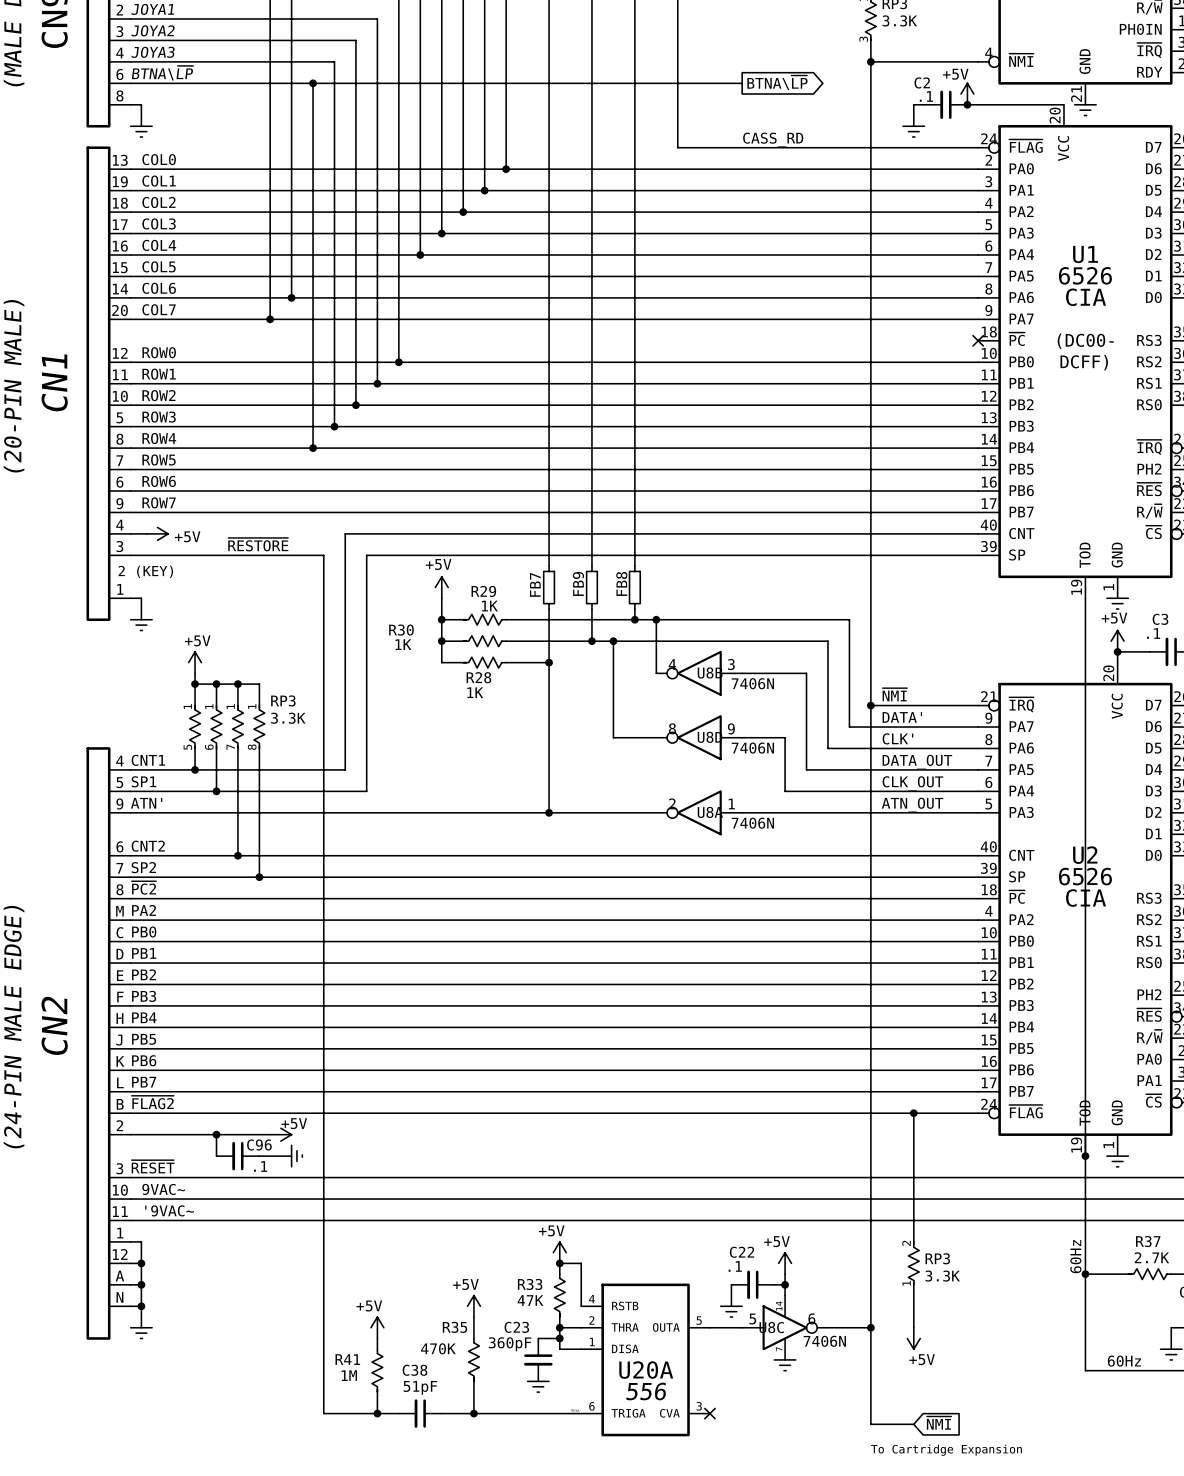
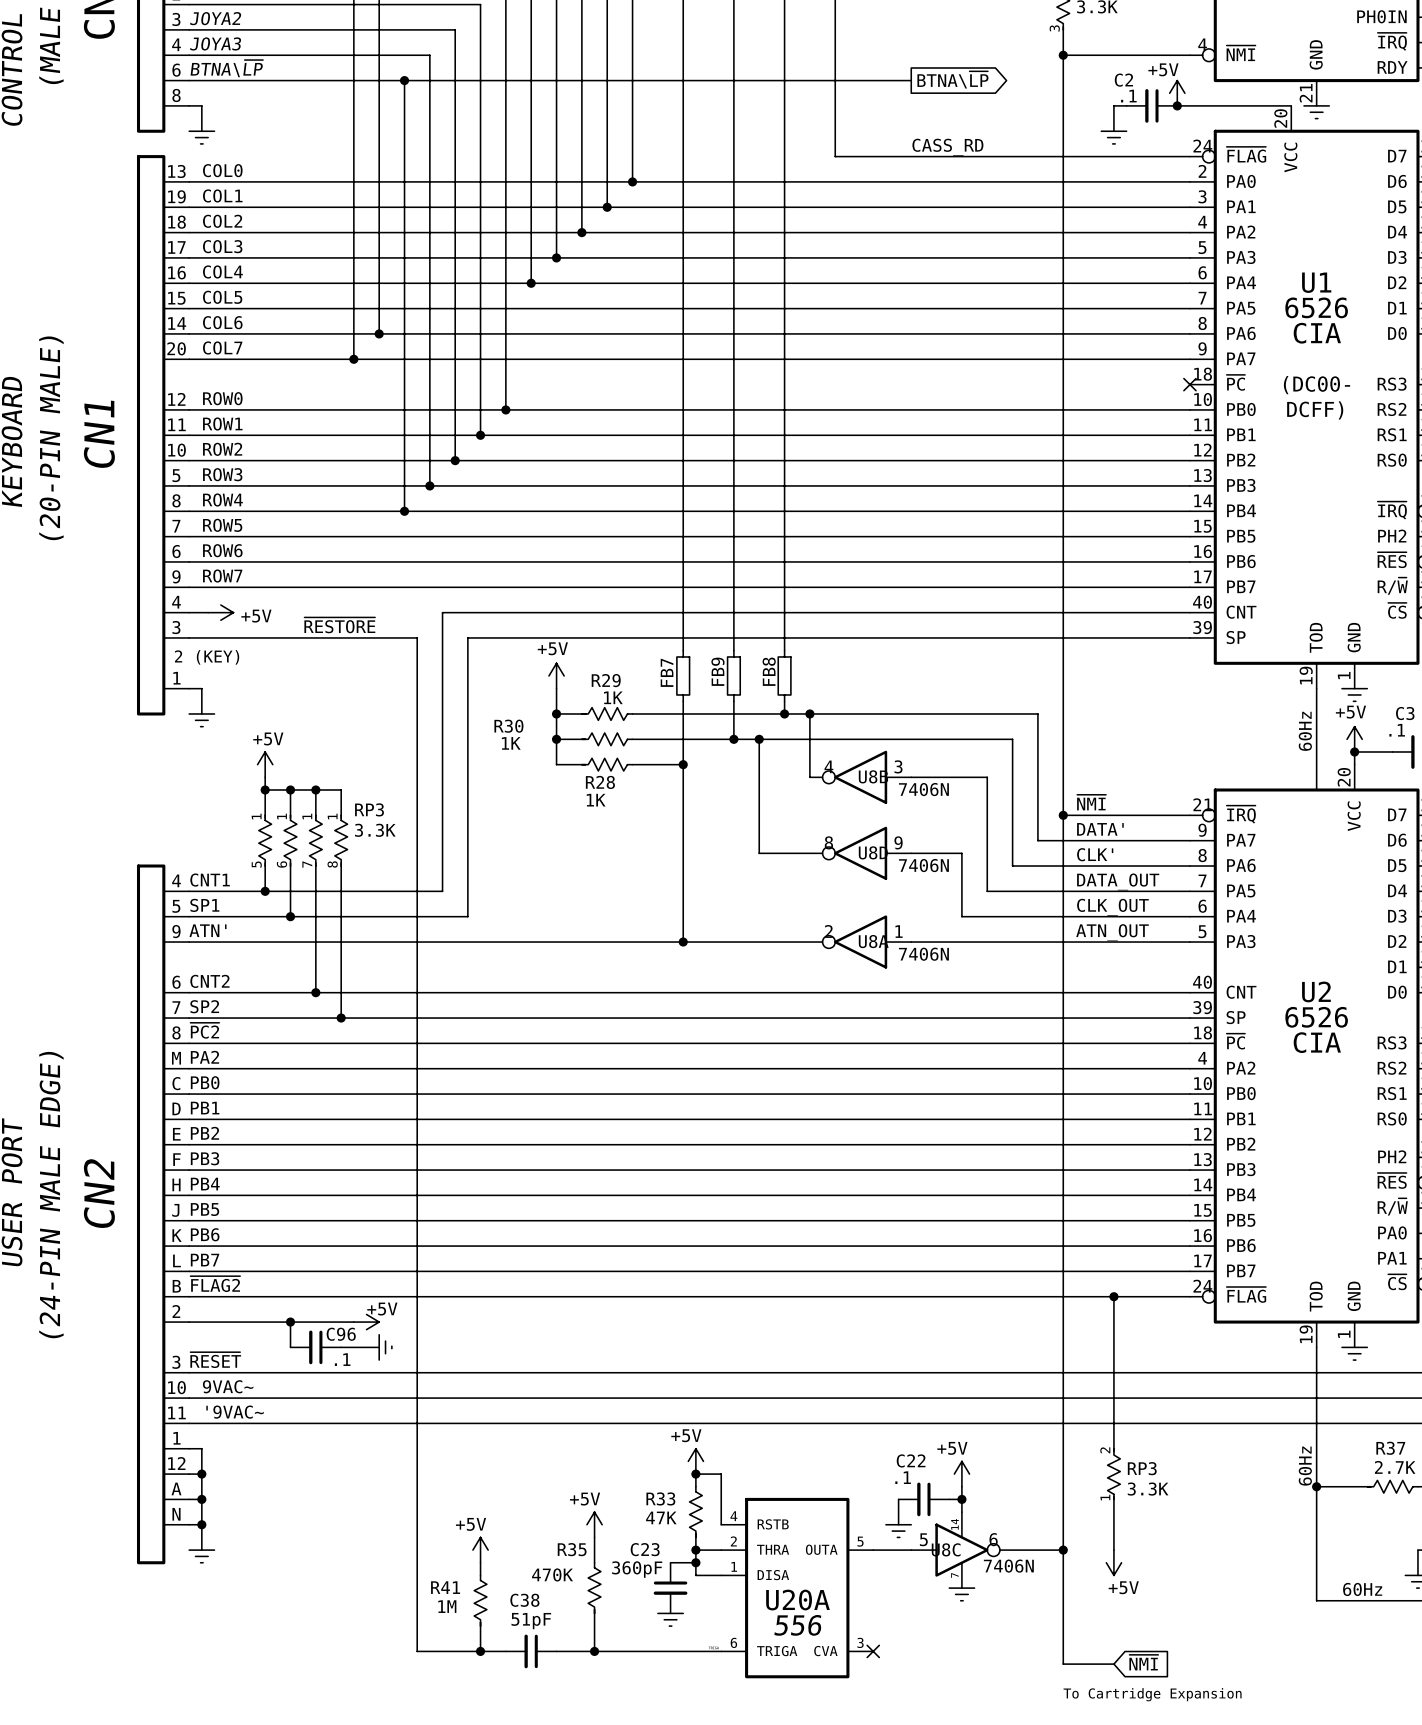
label: none -> 60Hz (1305, 731)
wire: (1085, 684) (1085, 1156) -> none
junction: (1085, 1156) -> none

